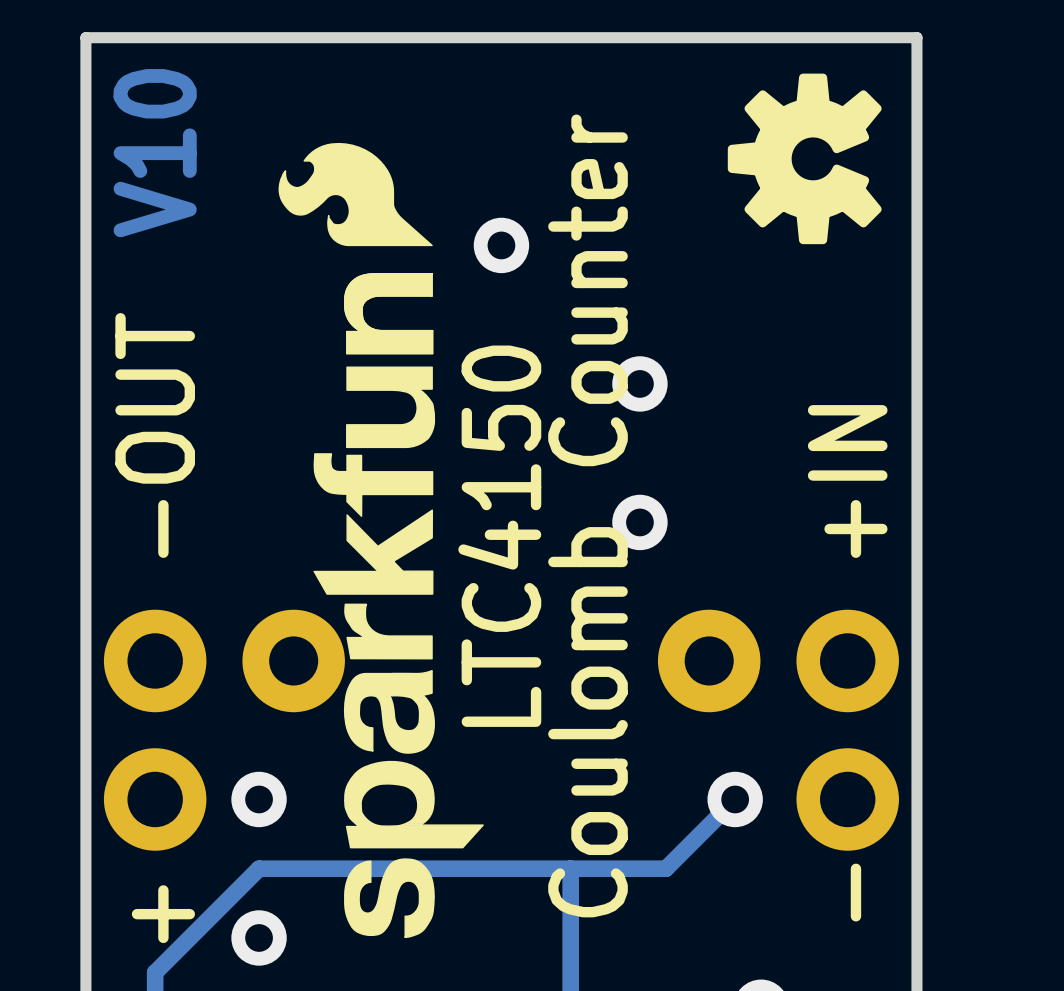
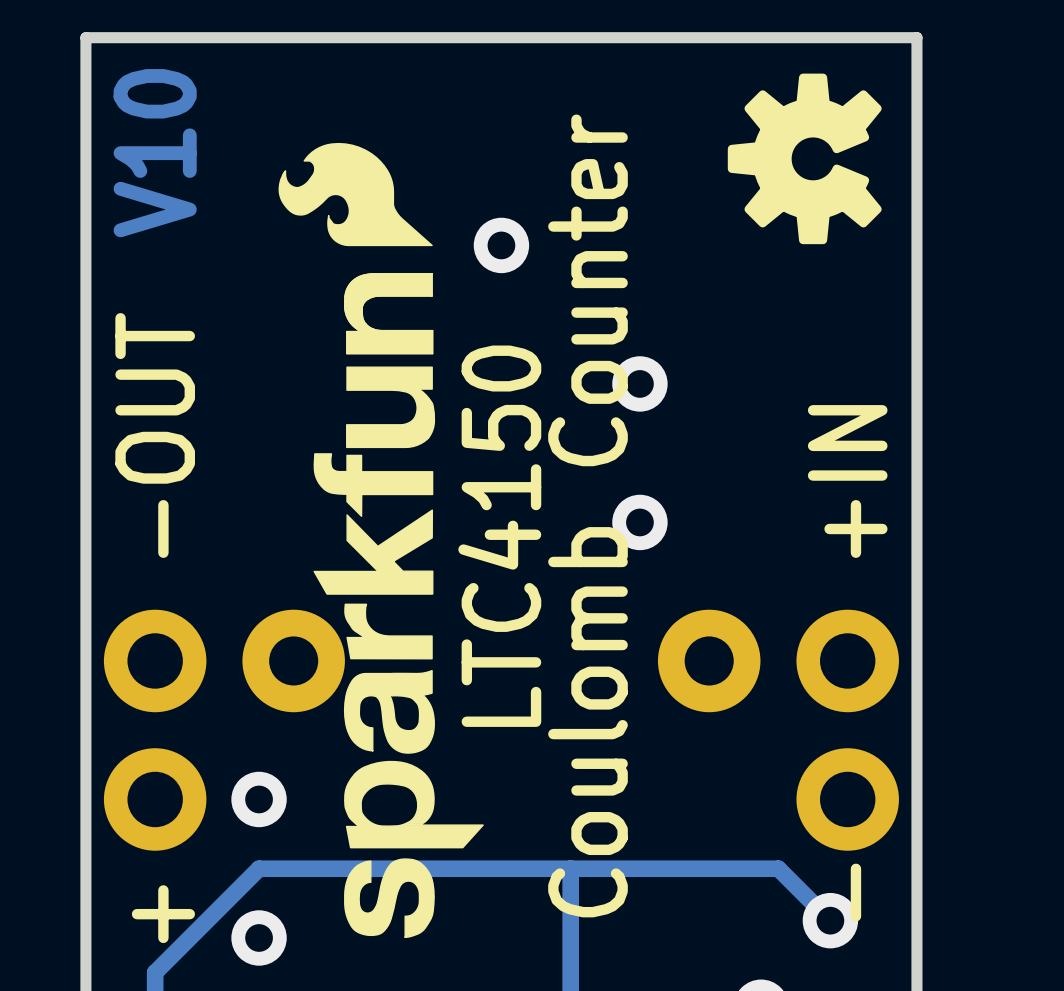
track: (735, 799) (665, 868) -> (830, 920) (778, 868) (665, 868)
via position: (735, 799) -> (830, 920)

